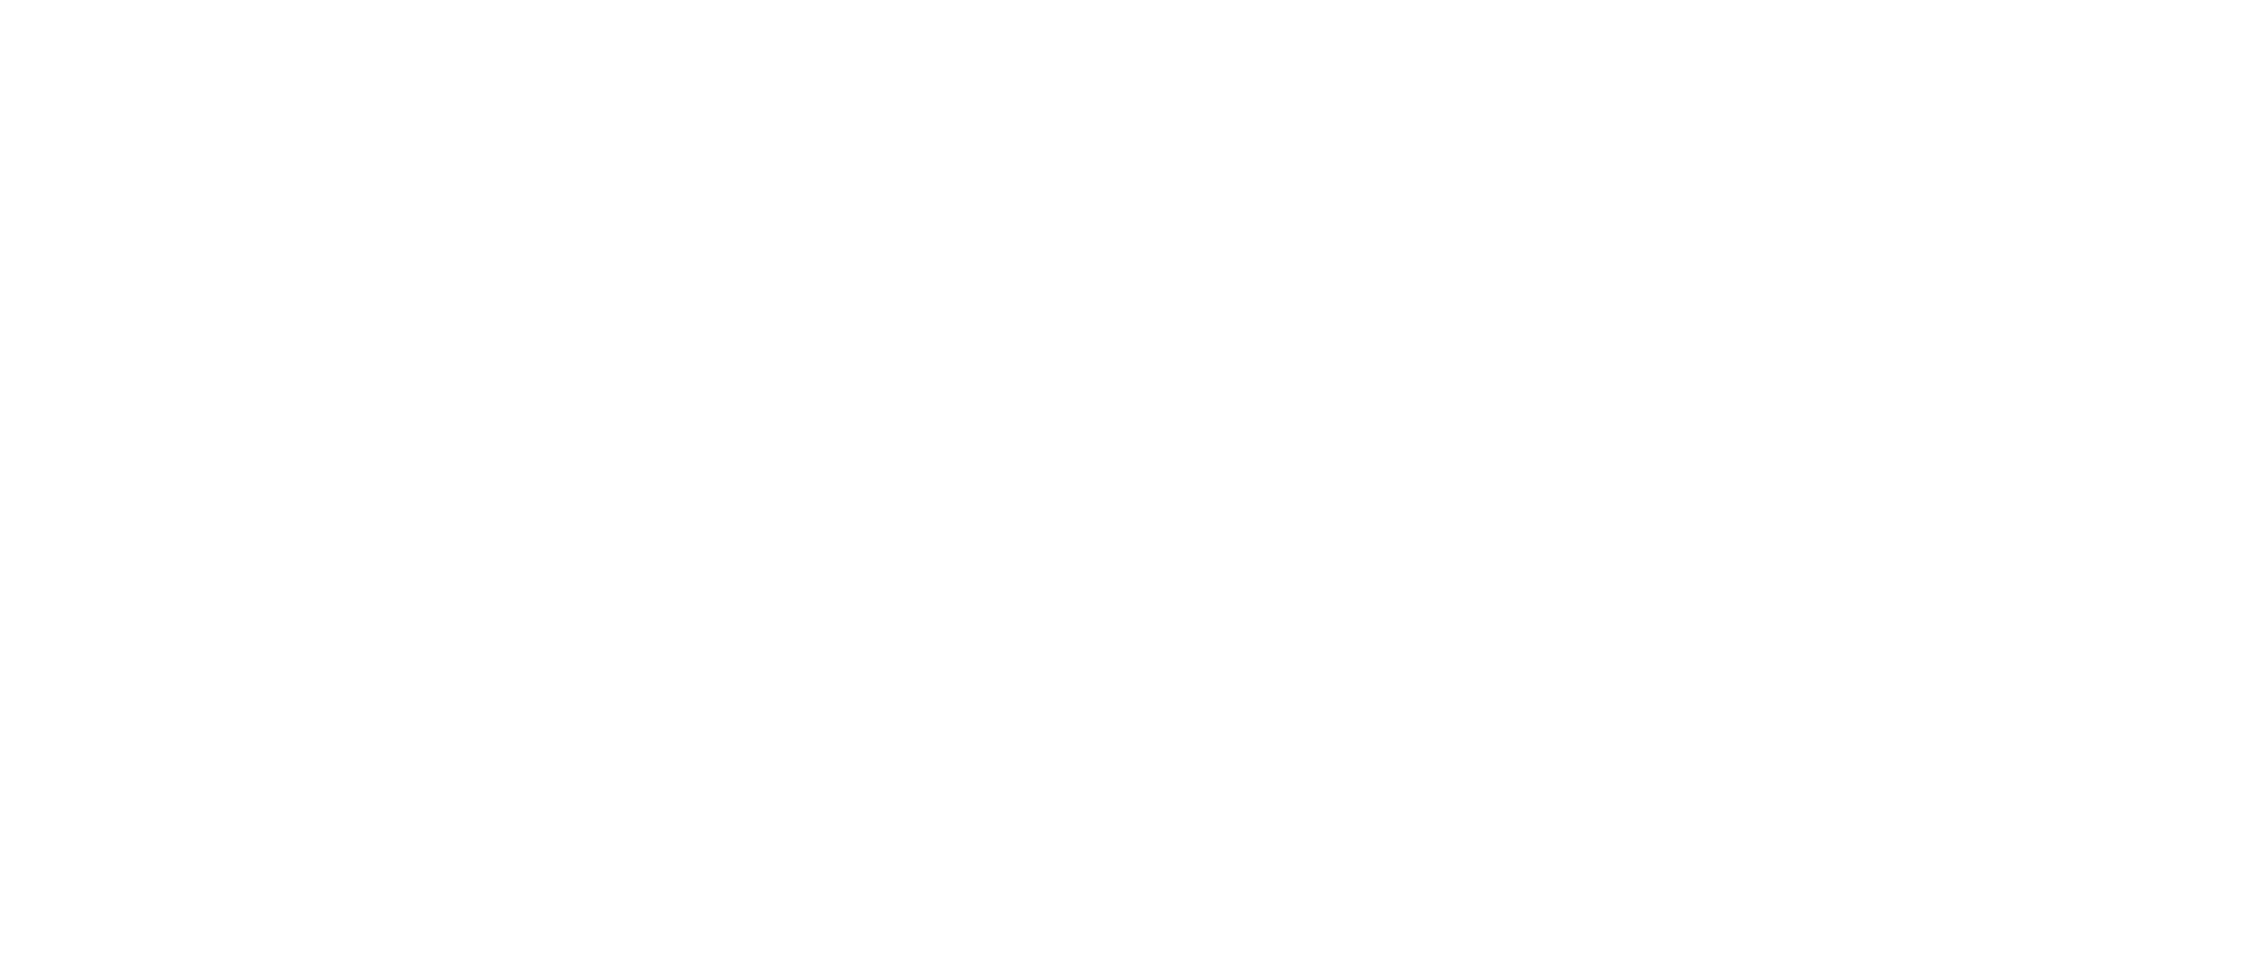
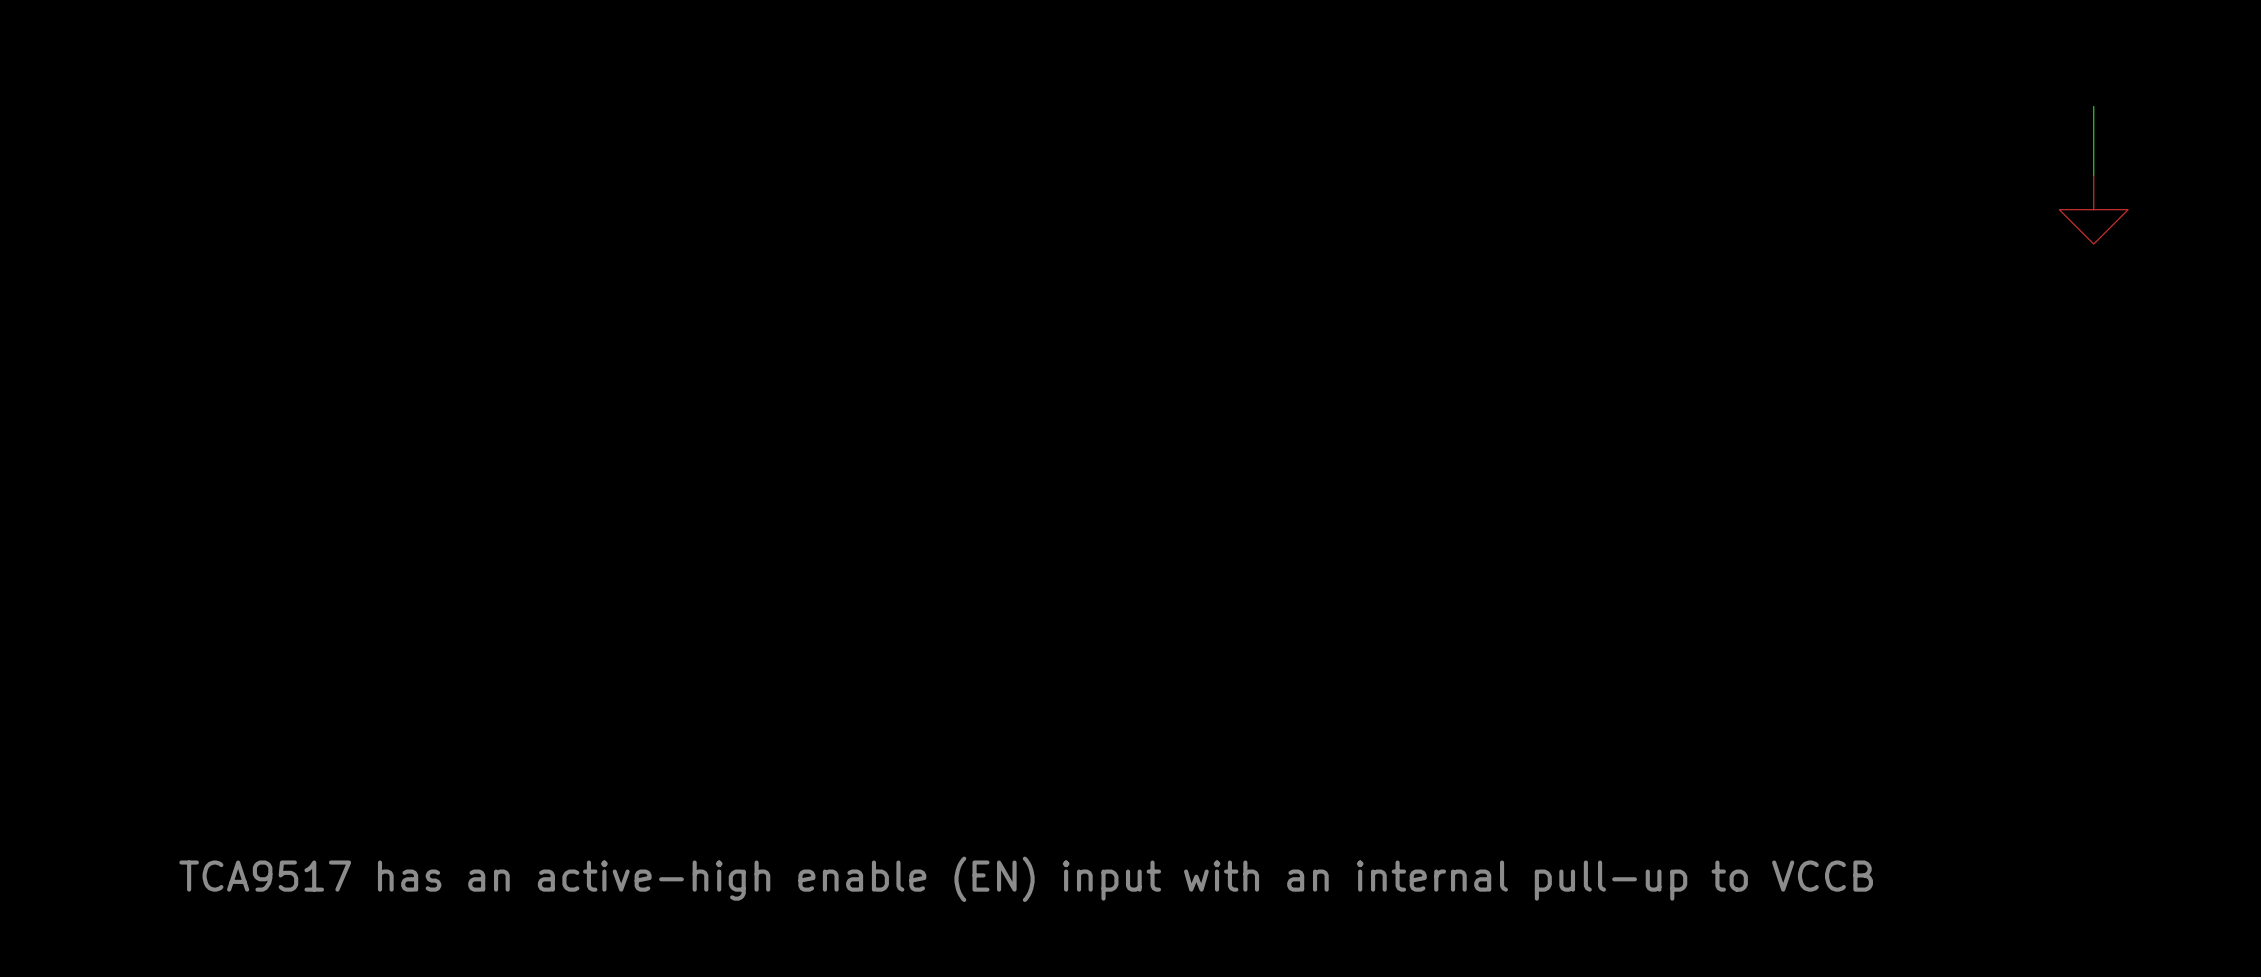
wire: none -> (2093, 106) (2093, 175)
power symbol: none -> (2093, 209)
text: none -> TCA9517 has an active-high enable (EN) input with an internal pull-up to VCCB (1026, 879)

